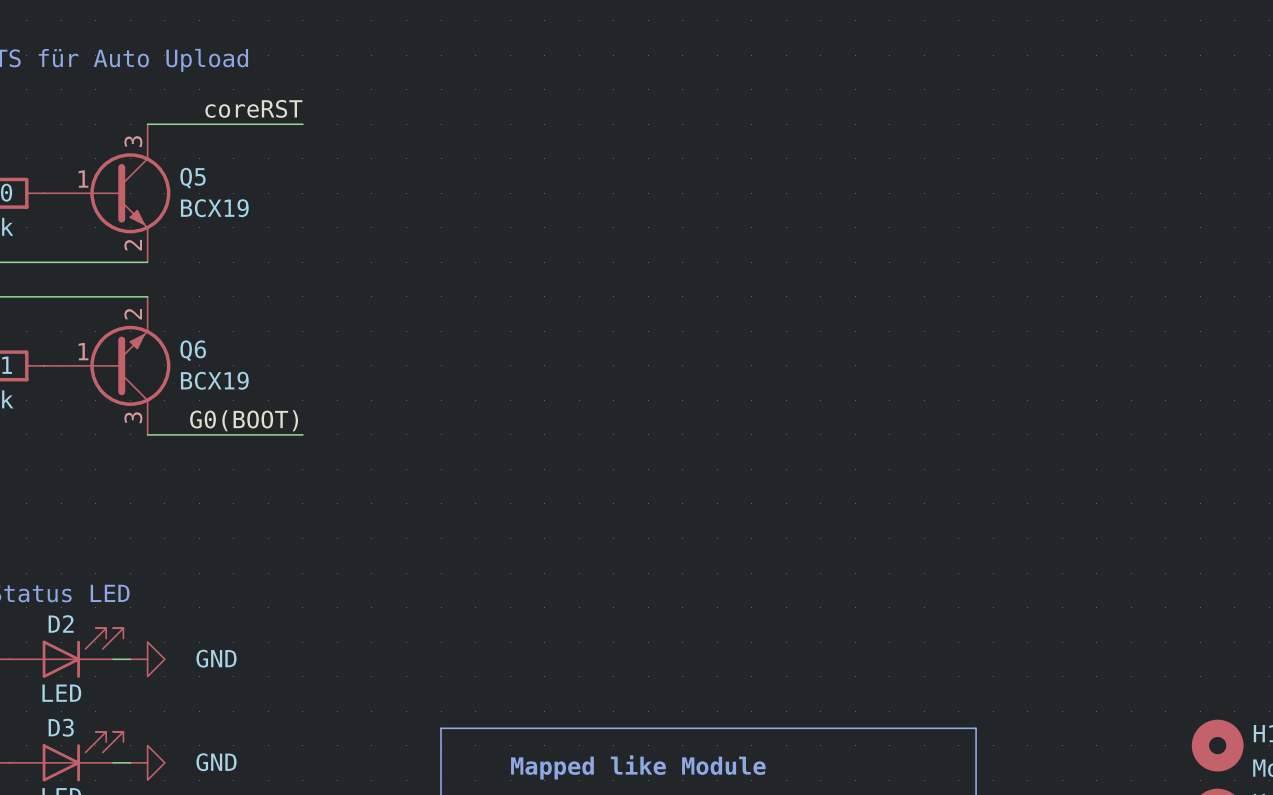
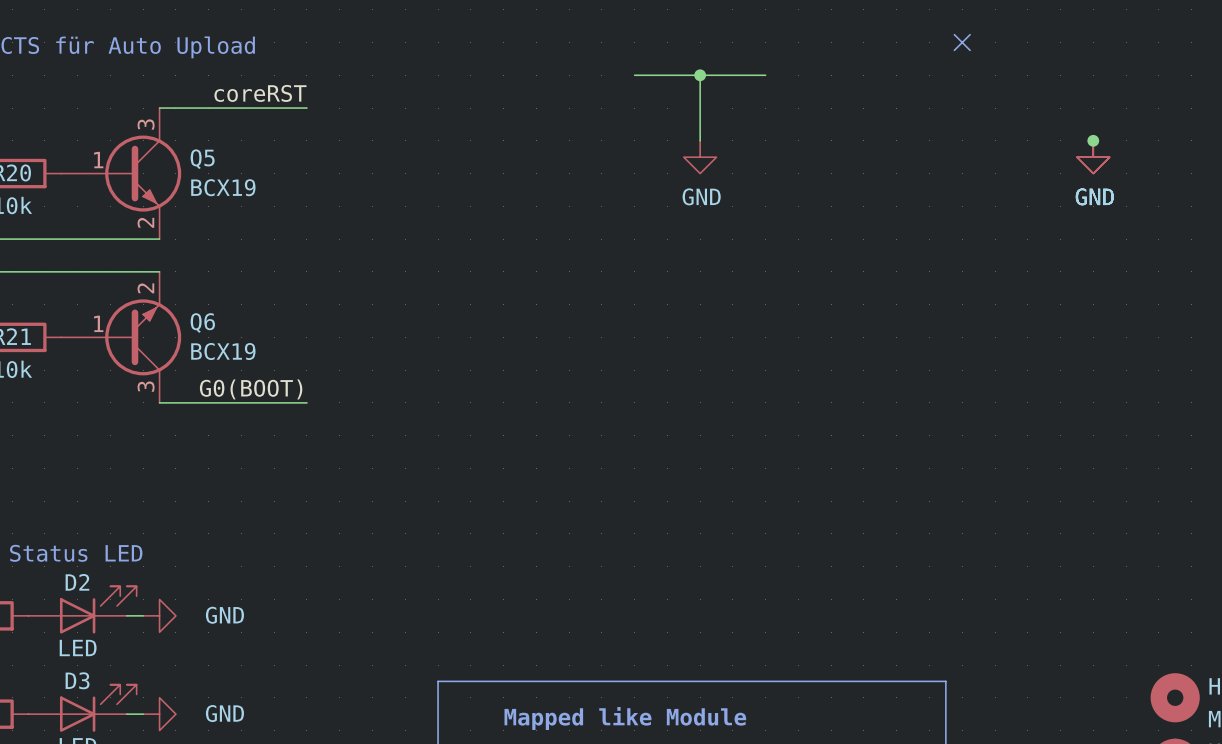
no-connect mark: none -> (962, 42)
wire: none -> (634, 75) (765, 75)
wire: none -> (700, 75) (700, 140)
junction: none -> (700, 75)
junction: none -> (1093, 140)
power symbol: none -> GND (700, 157)
power symbol: none -> GND (1093, 157)

